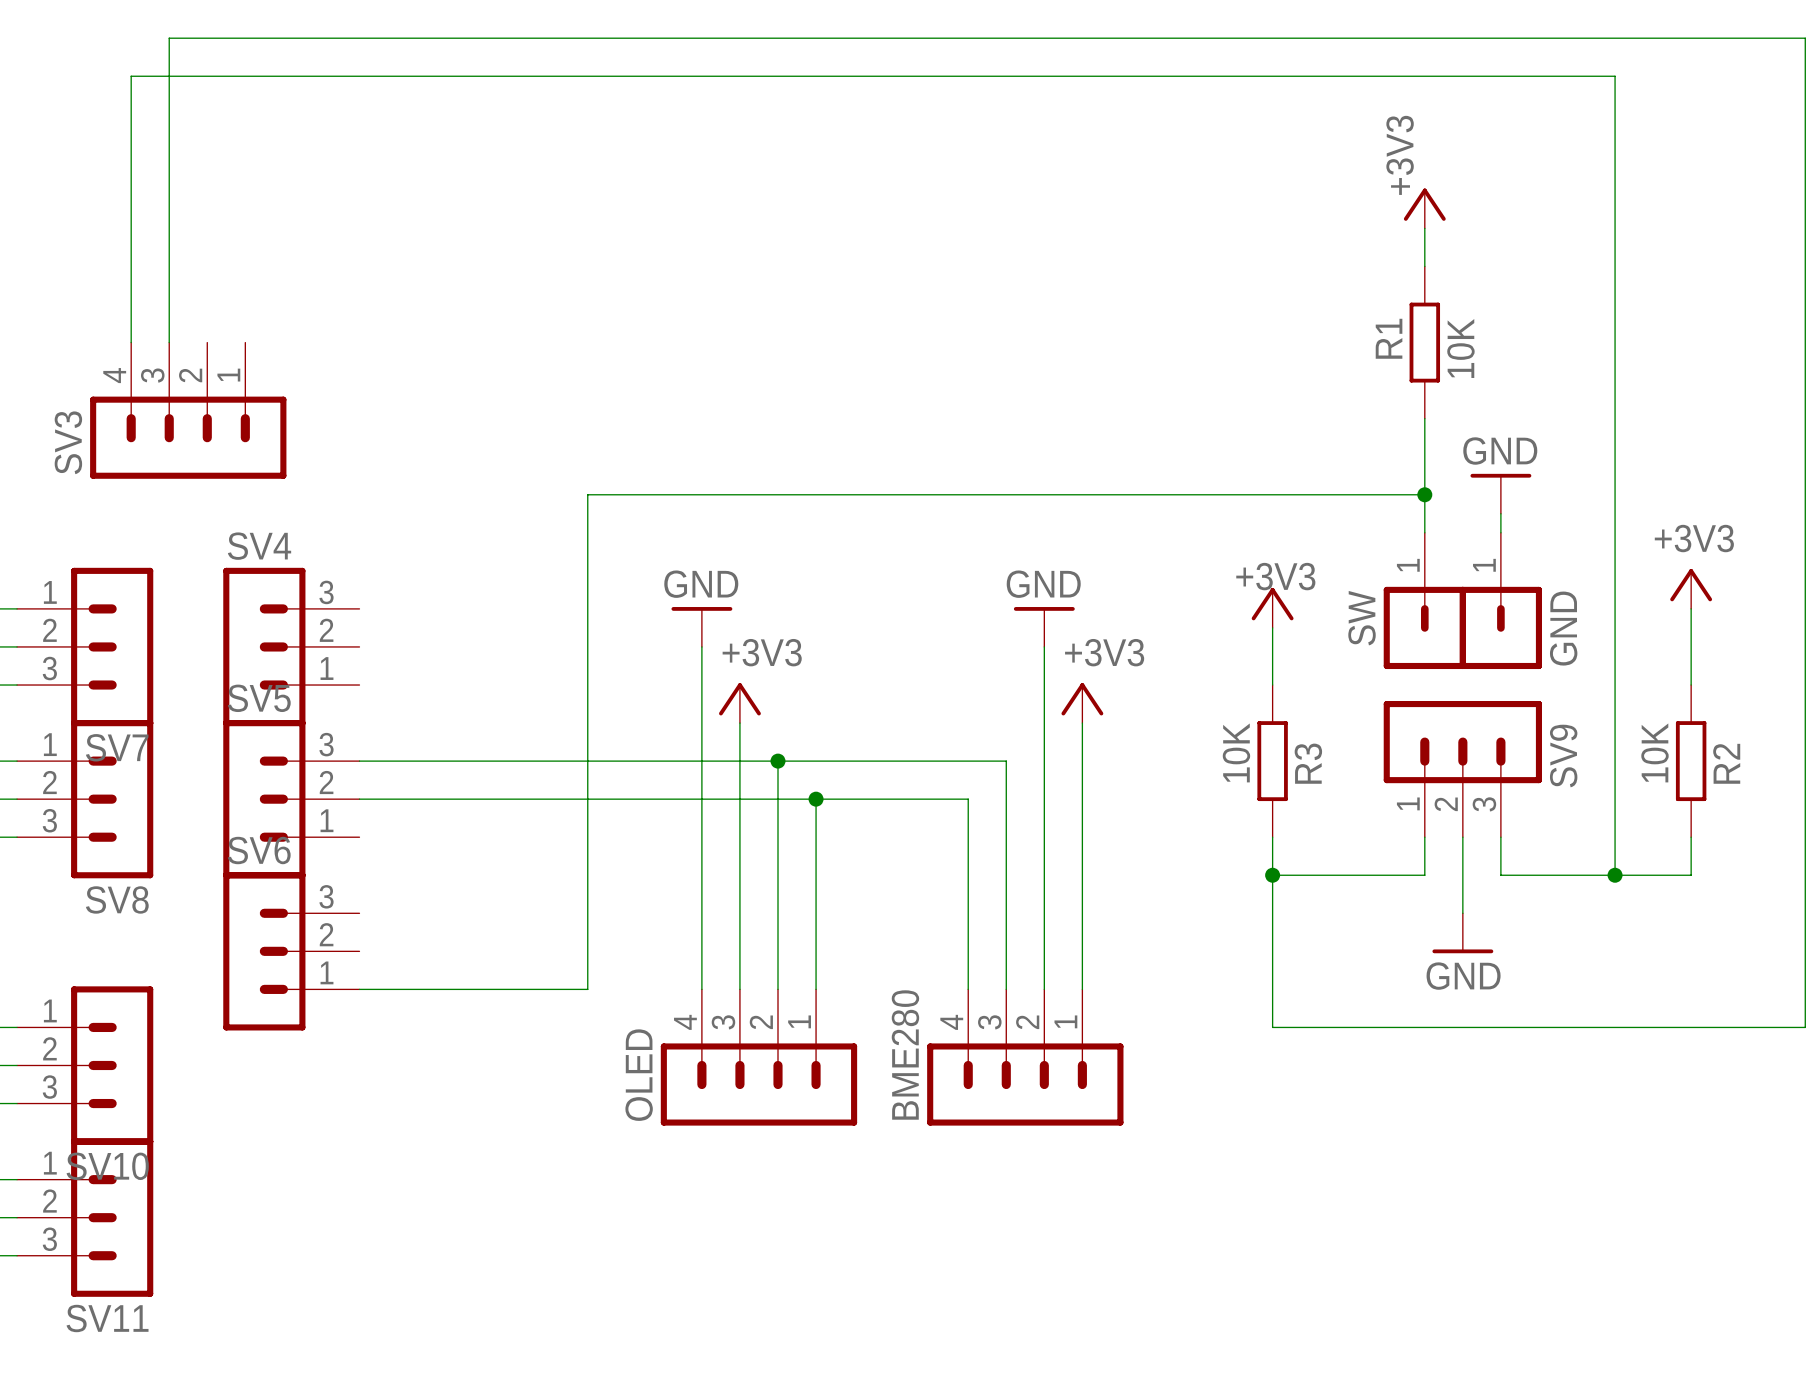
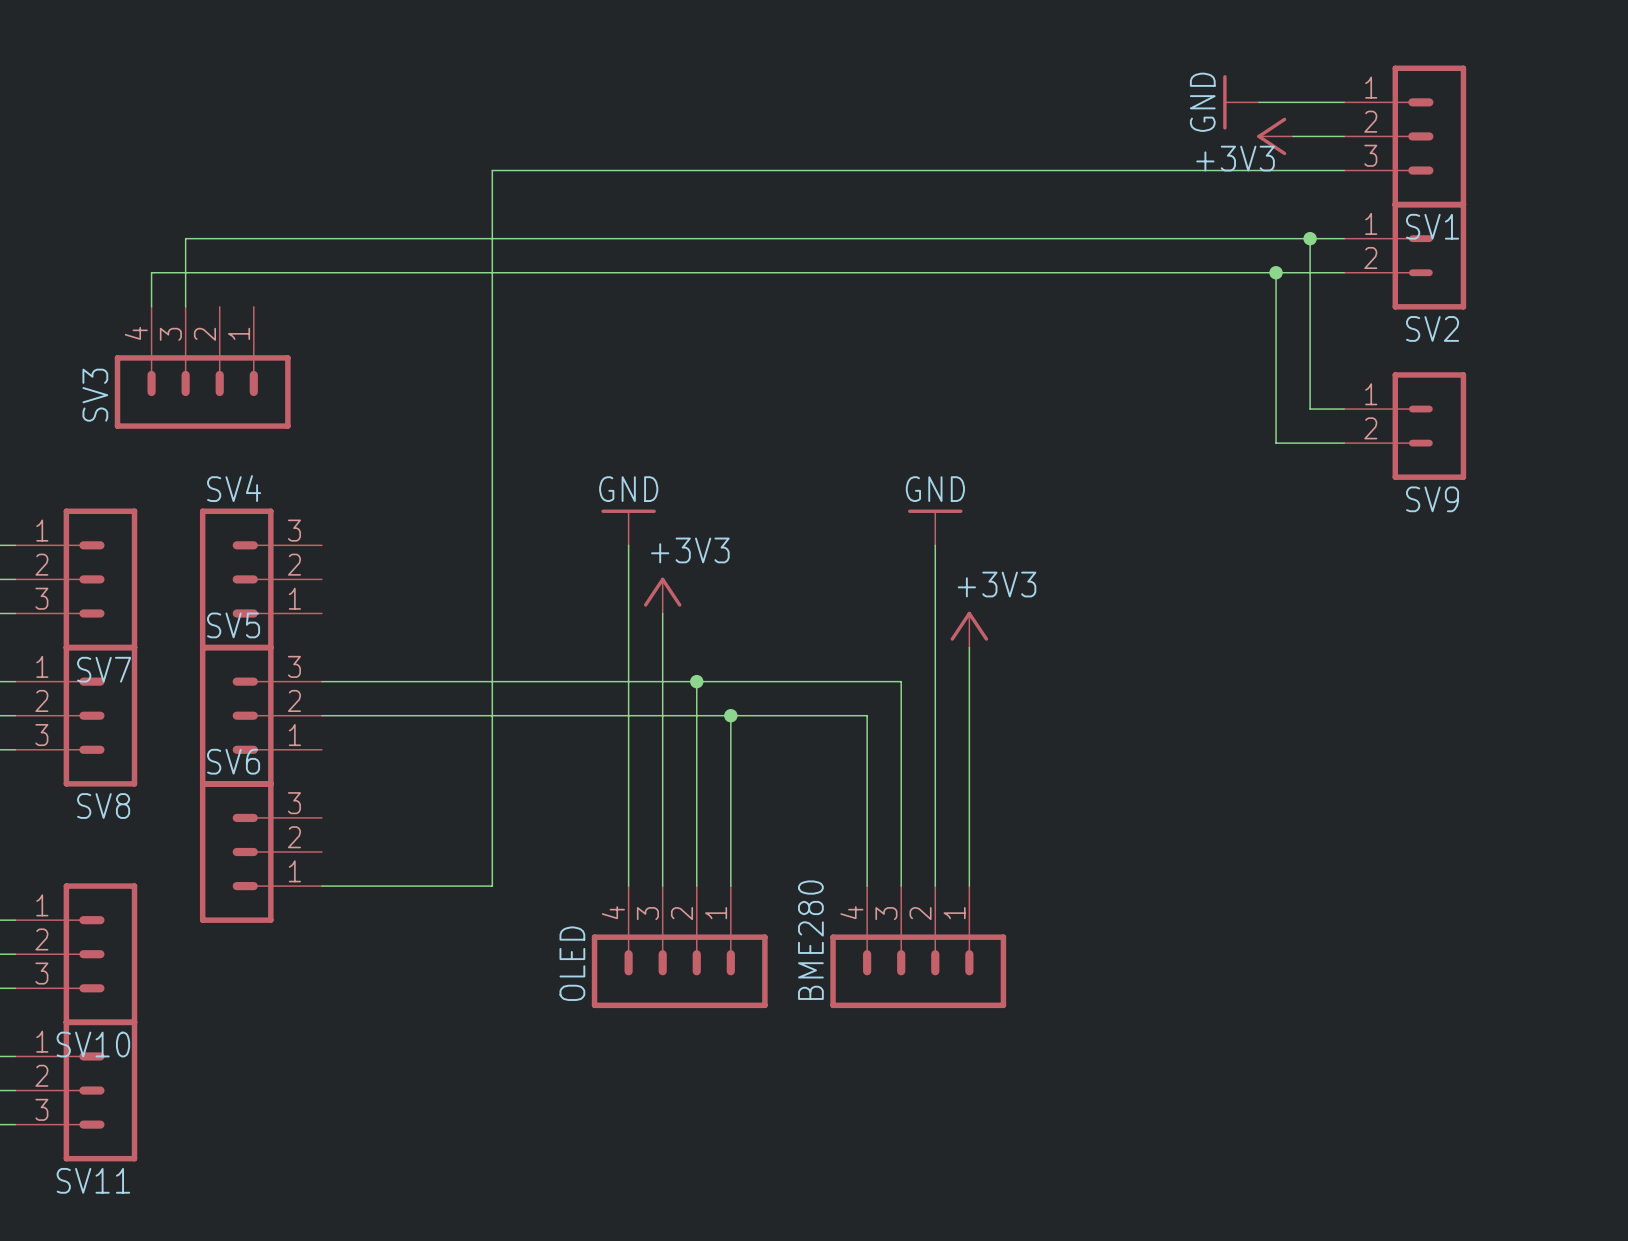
power symbol: none -> GND (1241, 102)
wire: none -> (1258, 102) (1344, 102)
wire: none -> (1293, 136) (1344, 136)
SV1: none -> (1405, 136)
power symbol rotation: 0° (1424, 204) -> 90° counterclockwise (1271, 136)
power symbol position: +3V3 (1424, 208) -> +3V3 (1275, 136)
wire: (1424, 228) (1424, 266) -> none
wire: none -> (1310, 238) (1310, 409) (1344, 409)
junction: none -> (1310, 238)
wire: none -> (1344, 238) (185, 238) (185, 306)
SV2: none -> (1405, 255)
wire: (169, 304) (169, 38) (1805, 38) (1805, 1027) (1272, 1027) (1272, 837) -> (151, 272) (1344, 272)
wire: none -> (1276, 272) (1276, 374)
junction: none -> (1276, 272)
wire: (131, 342) (131, 76) (1615, 76) (1615, 875) -> none
R1: 10K (1424, 342) -> none
SV3 position: (188, 410) -> (202, 367)
power symbol: GND (1500, 493) -> none
wire: none -> (1276, 443) (1344, 443)
junction: (1424, 494) -> none
wire: (1500, 513) (1500, 532) -> none
wire: (1424, 532) (1424, 494) (587, 494) (587, 989) (549, 989) -> (1344, 170) (492, 170) (492, 886)
power symbol: +3V3 (1691, 588) -> none
SW: (1424, 600) -> none
GND: (1500, 600) -> none
power symbol: +3V3 (1272, 607) -> none
wire: (1691, 608) (1691, 685) -> none
power symbol position: GND (701, 626) -> GND (628, 527)
power symbol position: GND (1044, 626) -> GND (935, 527)
wire: (1272, 627) (1272, 685) -> none
SV9 symbol: [1383, 700, 1542, 838] -> [1344, 372, 1467, 480]
power symbol position: +3V3 (739, 703) -> +3V3 (662, 595)
SV9 name position: SV9 (1563, 756) -> SV9 (1432, 499)
R3: 10K (1272, 761) -> none
R2: 10K (1691, 761) -> none
wire: (1424, 837) (1424, 875) (1272, 875) -> none
wire: (1462, 837) (1462, 913) -> none
wire: (1500, 837) (1500, 875) (1691, 875) (1691, 837) -> none
junction: (1272, 875) -> none
junction: (1615, 875) -> none
power symbol: GND (1462, 933) -> none

